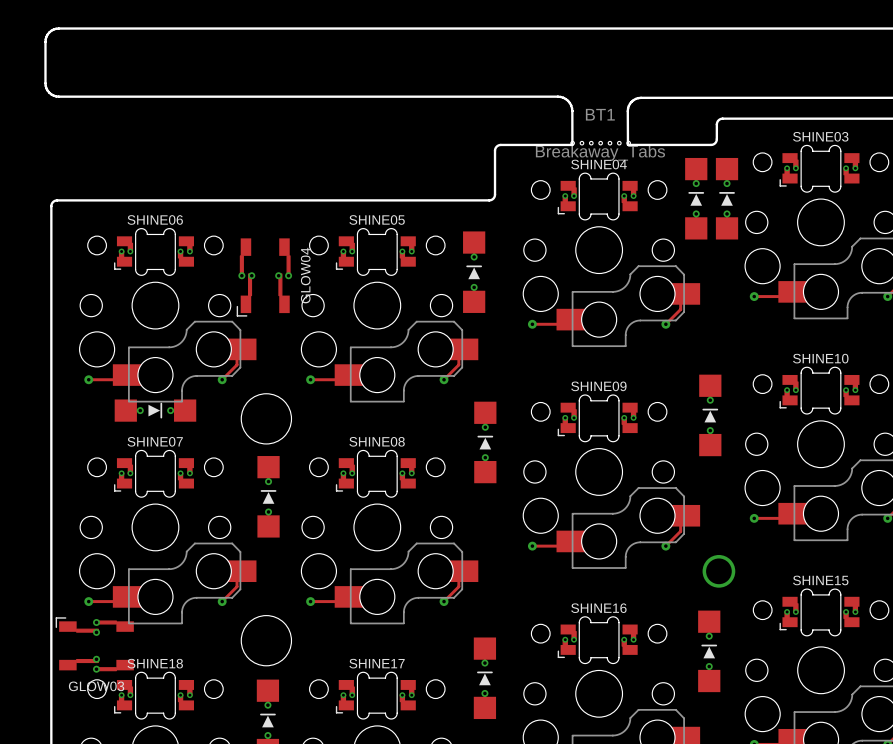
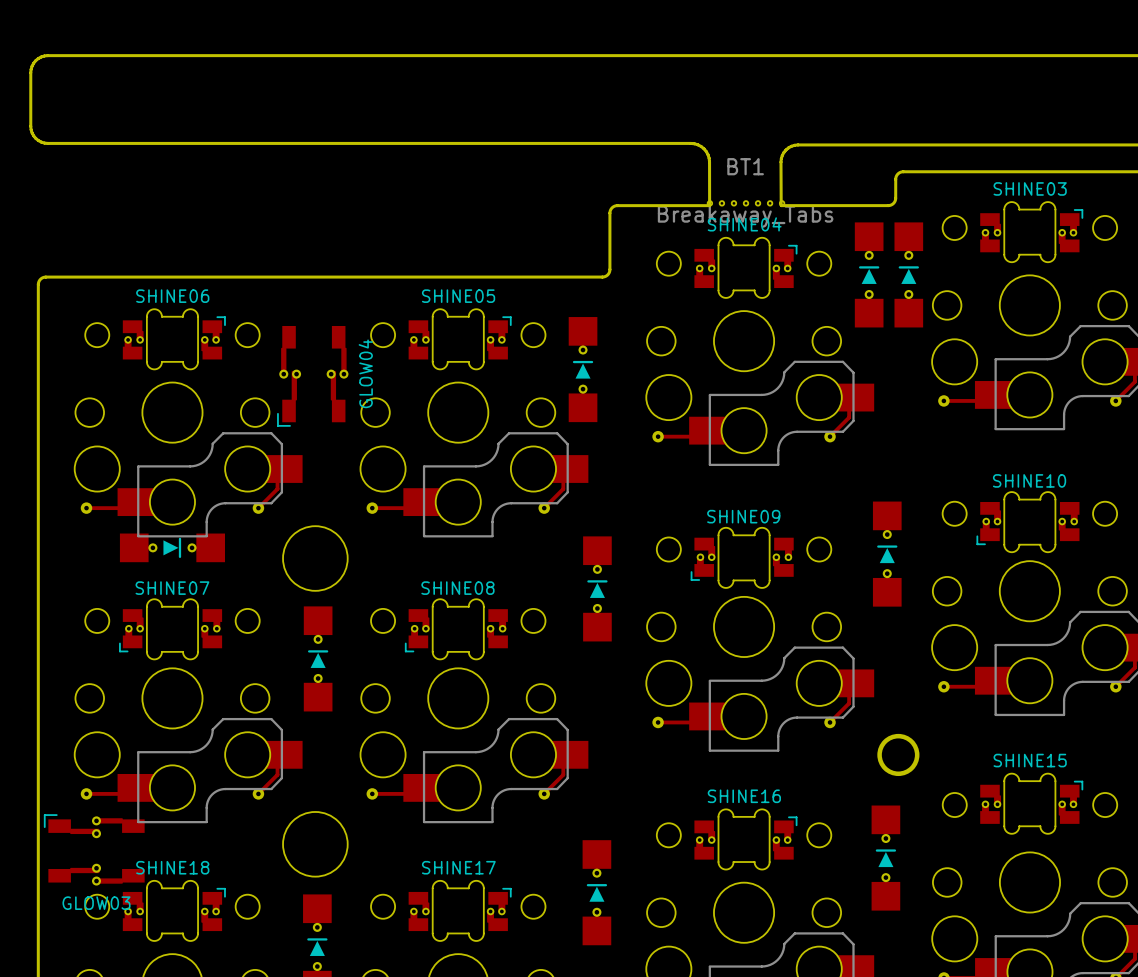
SHINE03 rotation: 0° (819, 168) -> 180° (1031, 232)
SHINE04 rotation: 0° (597, 196) -> 180° (745, 267)
SHINE06 rotation: 0° (154, 251) -> 180° (174, 339)
SHINE05 rotation: 0° (375, 251) -> 180° (460, 339)
SHINE15 rotation: 0° (819, 612) -> 180° (1031, 803)
SHINE16 rotation: 0° (597, 640) -> 180° (745, 839)
SHINE18 rotation: 0° (154, 695) -> 180° (174, 910)
SHINE17 rotation: 0° (375, 695) -> 180° (460, 910)

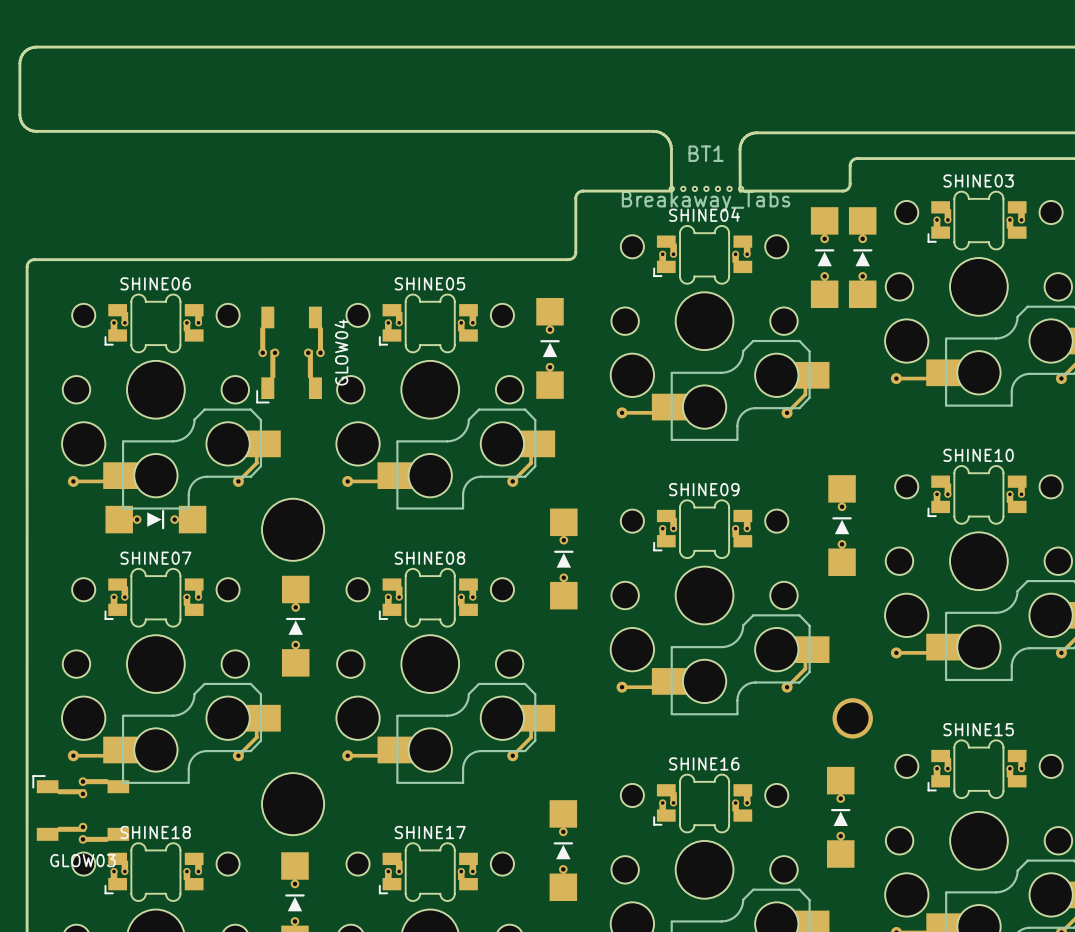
SHINE03 rotation: 0° (1031, 232) -> 180° (977, 220)
SHINE04 rotation: 0° (745, 267) -> 180° (702, 254)
SHINE06 rotation: 0° (174, 339) -> 180° (154, 323)
SHINE05 rotation: 0° (460, 339) -> 180° (428, 323)
SHINE15 rotation: 0° (1031, 803) -> 180° (977, 769)
SHINE16 rotation: 0° (745, 839) -> 180° (702, 803)
SHINE18 rotation: 0° (174, 910) -> 180° (154, 872)
SHINE17 rotation: 0° (460, 910) -> 180° (428, 872)

